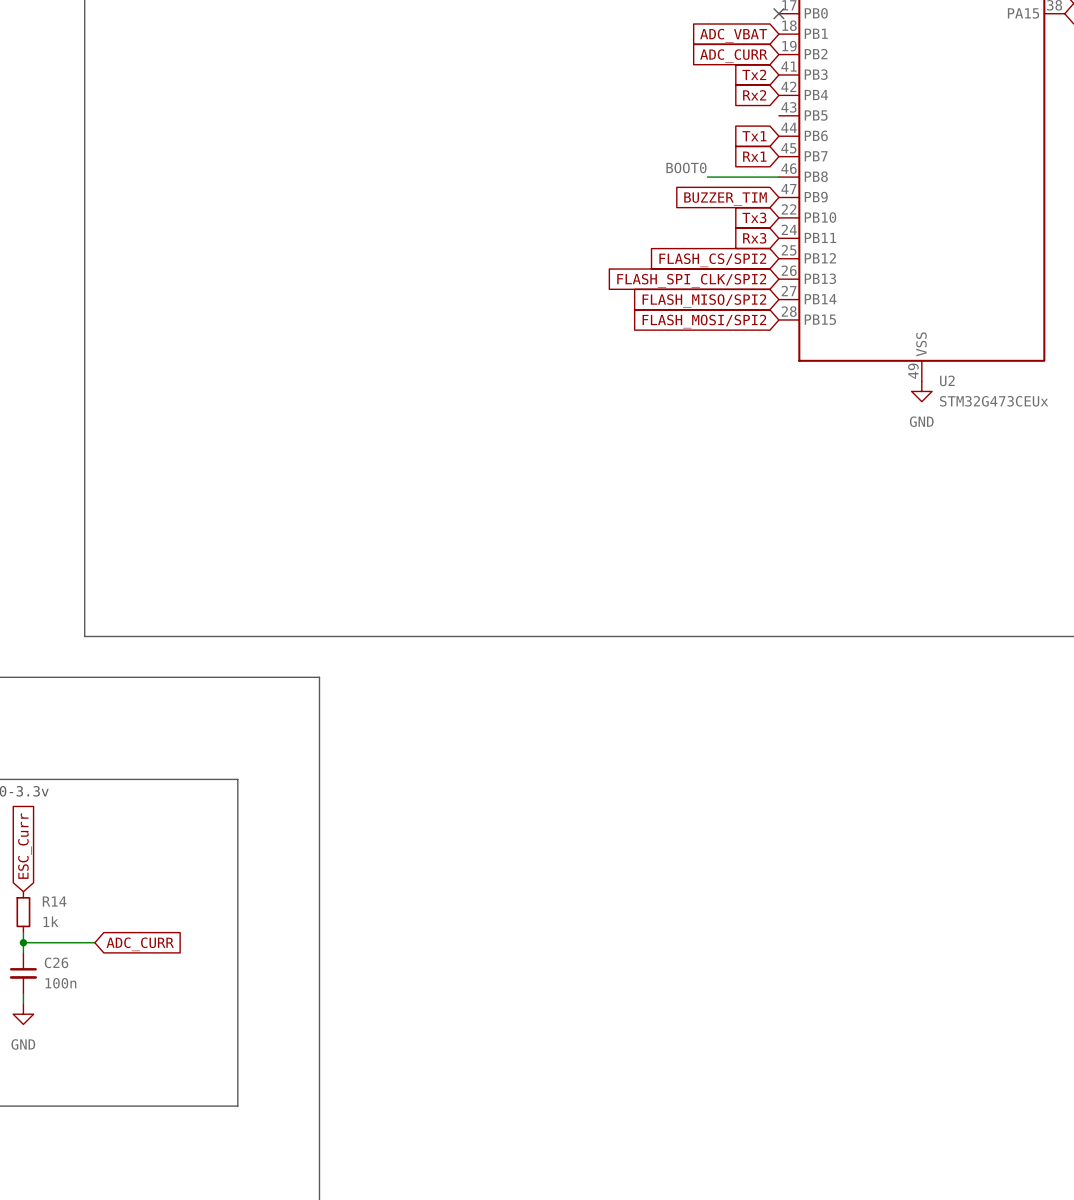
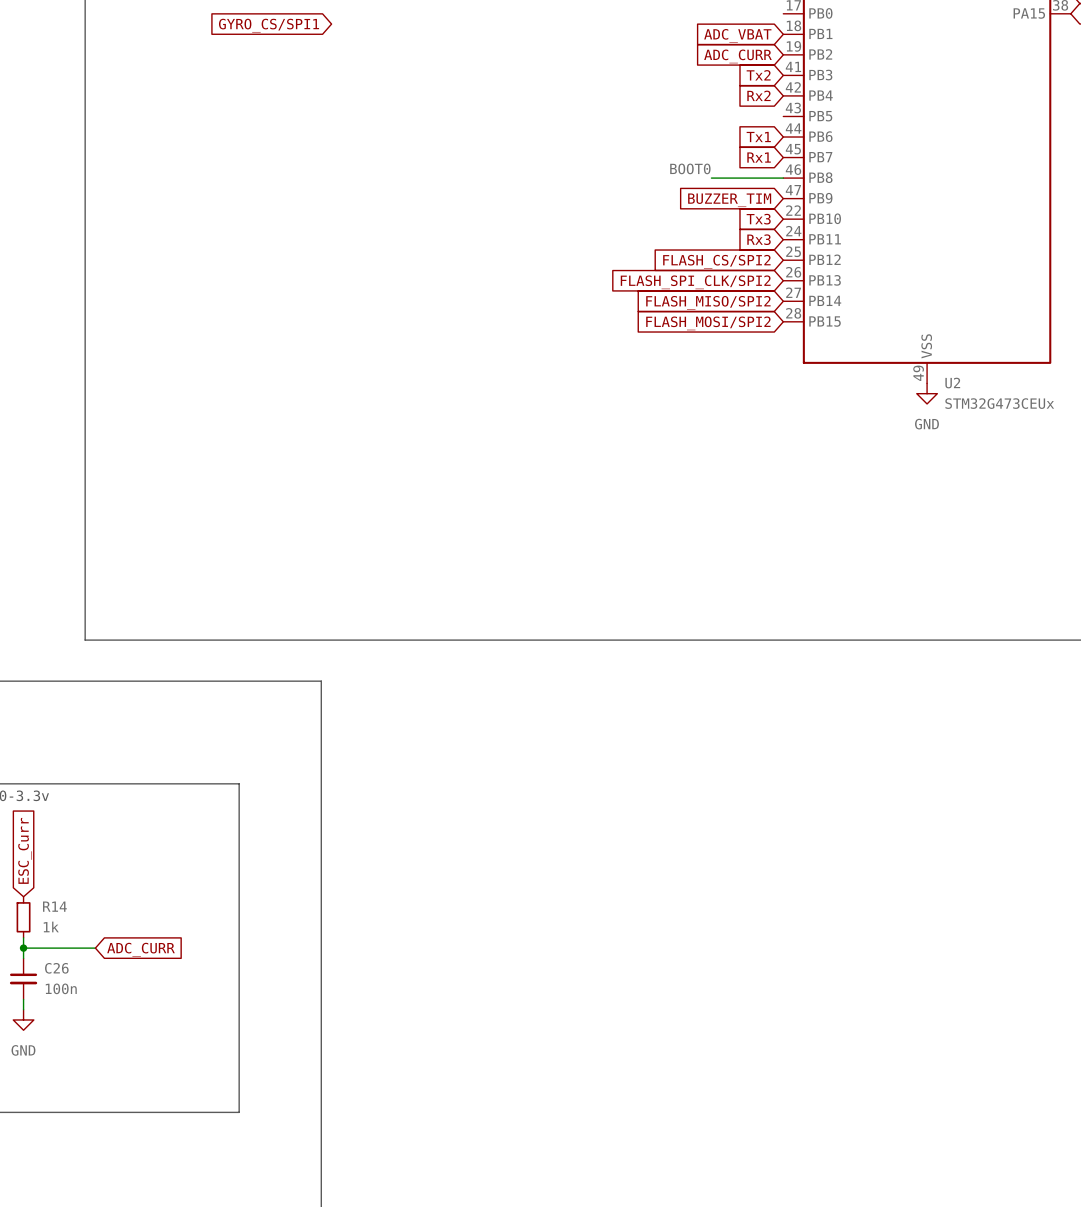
no-connect mark: (778, 13) -> none
global label: none -> GYRO_CS/SPI1 (269, 25)

